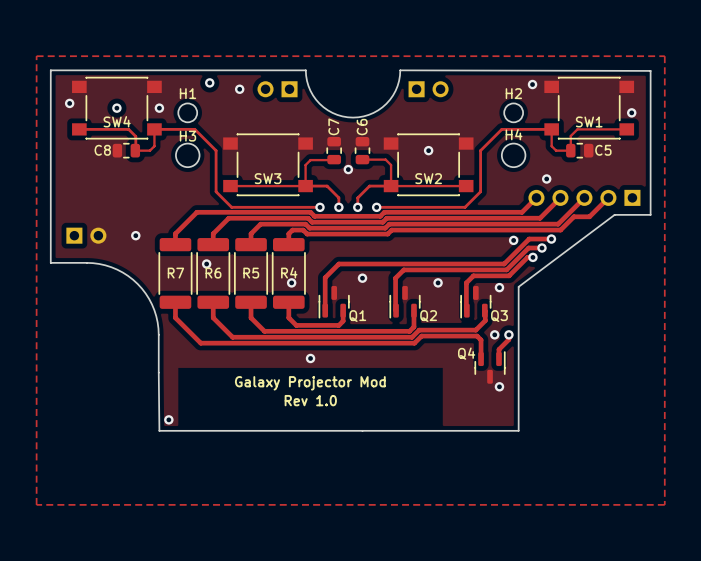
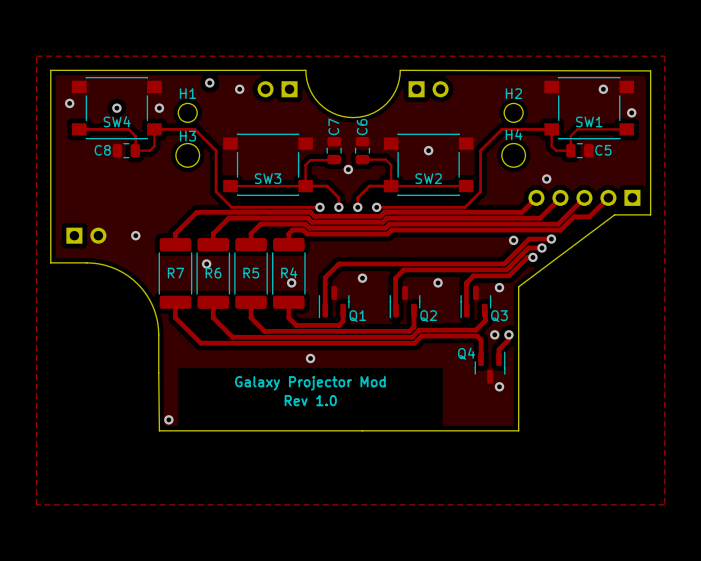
via: (532, 84) -> none
via: none -> (603, 89)

